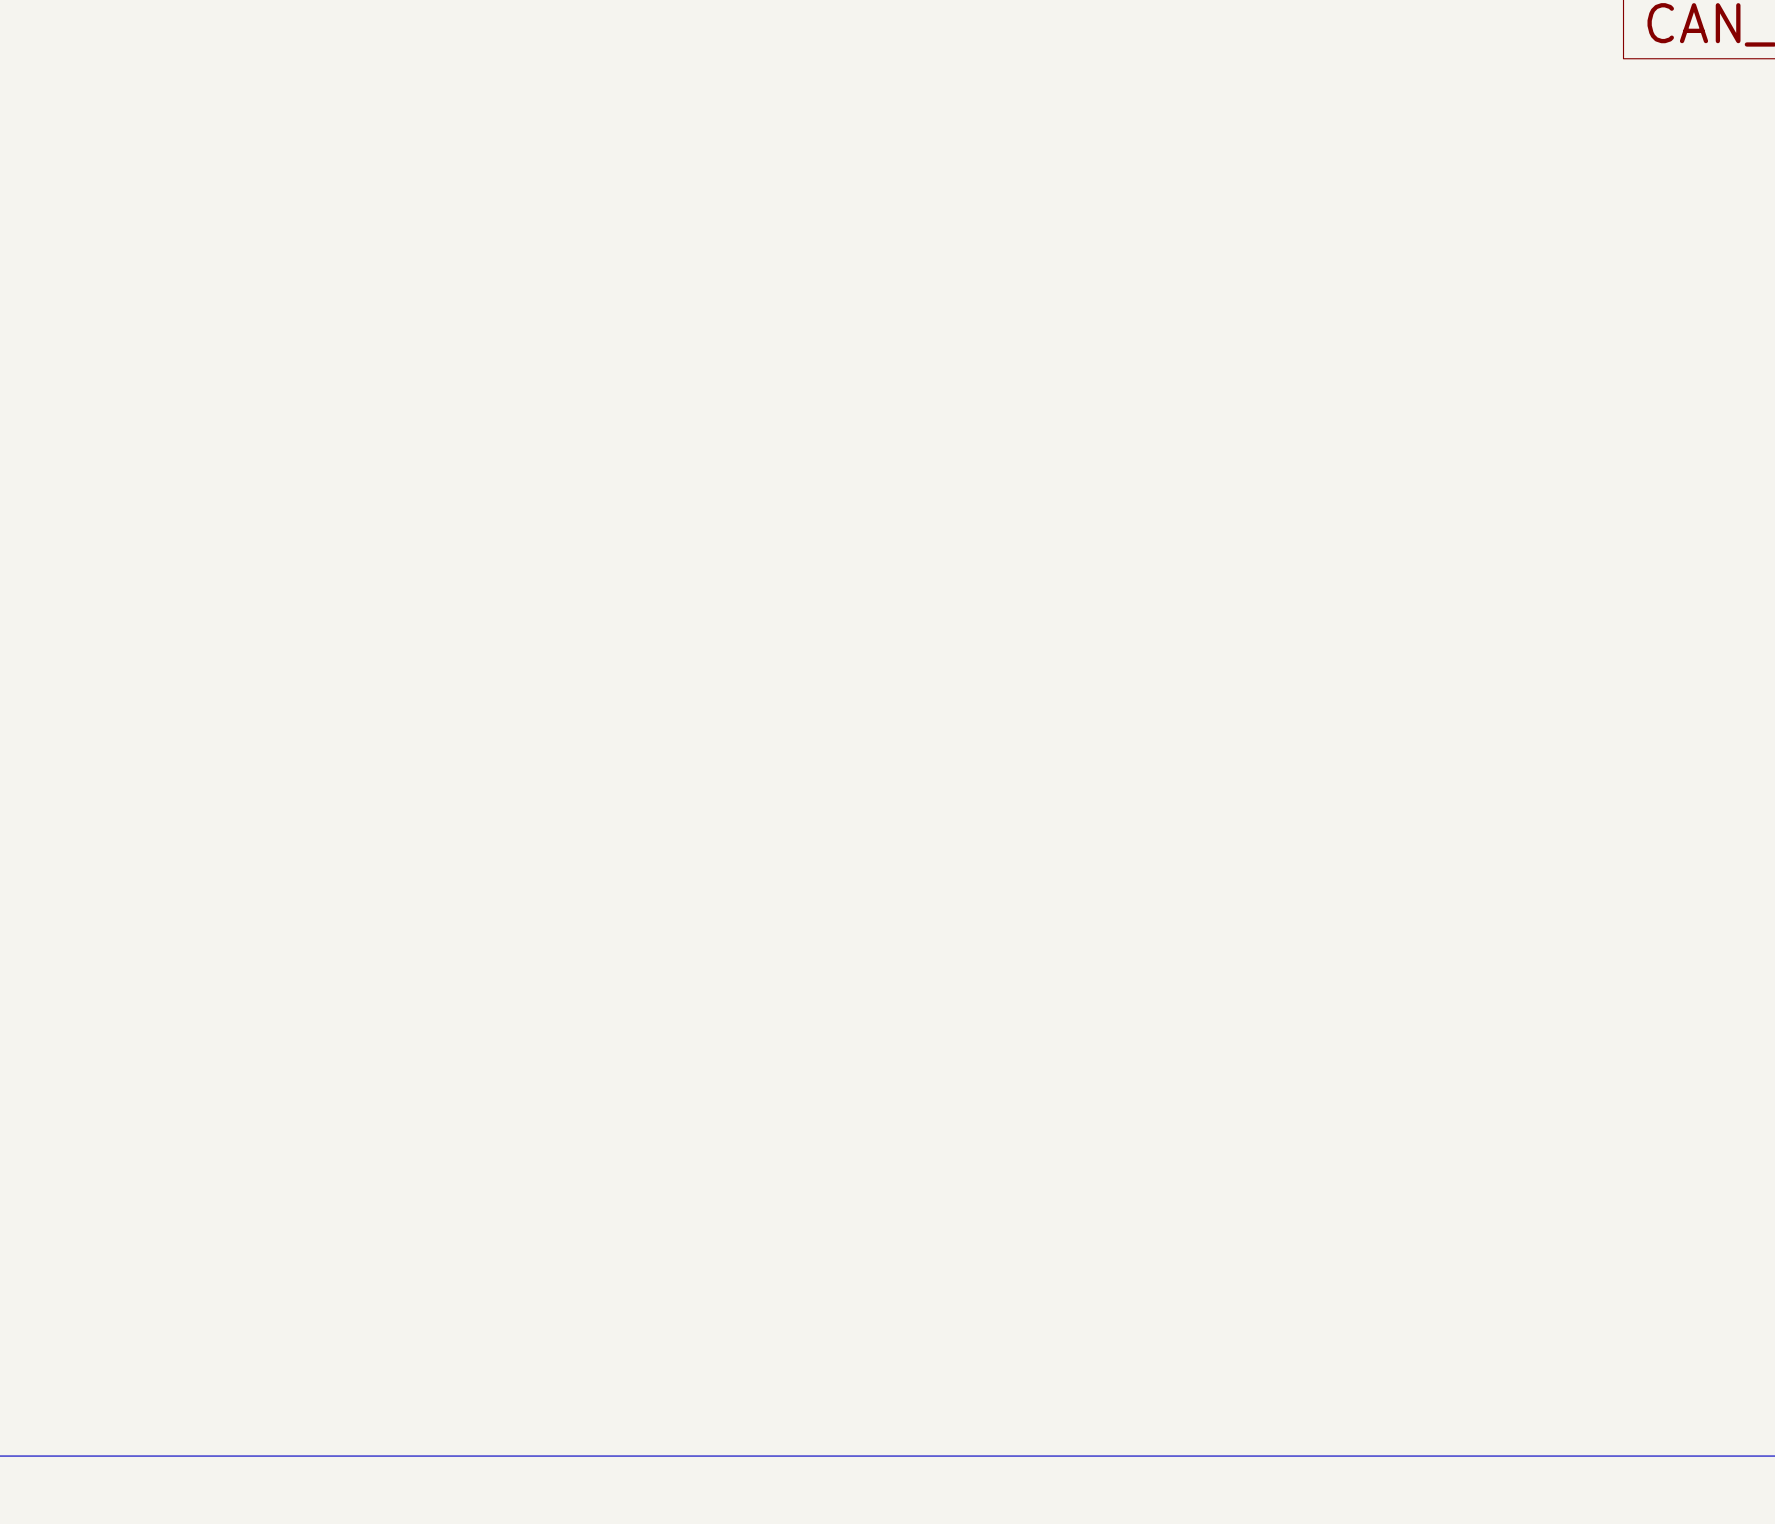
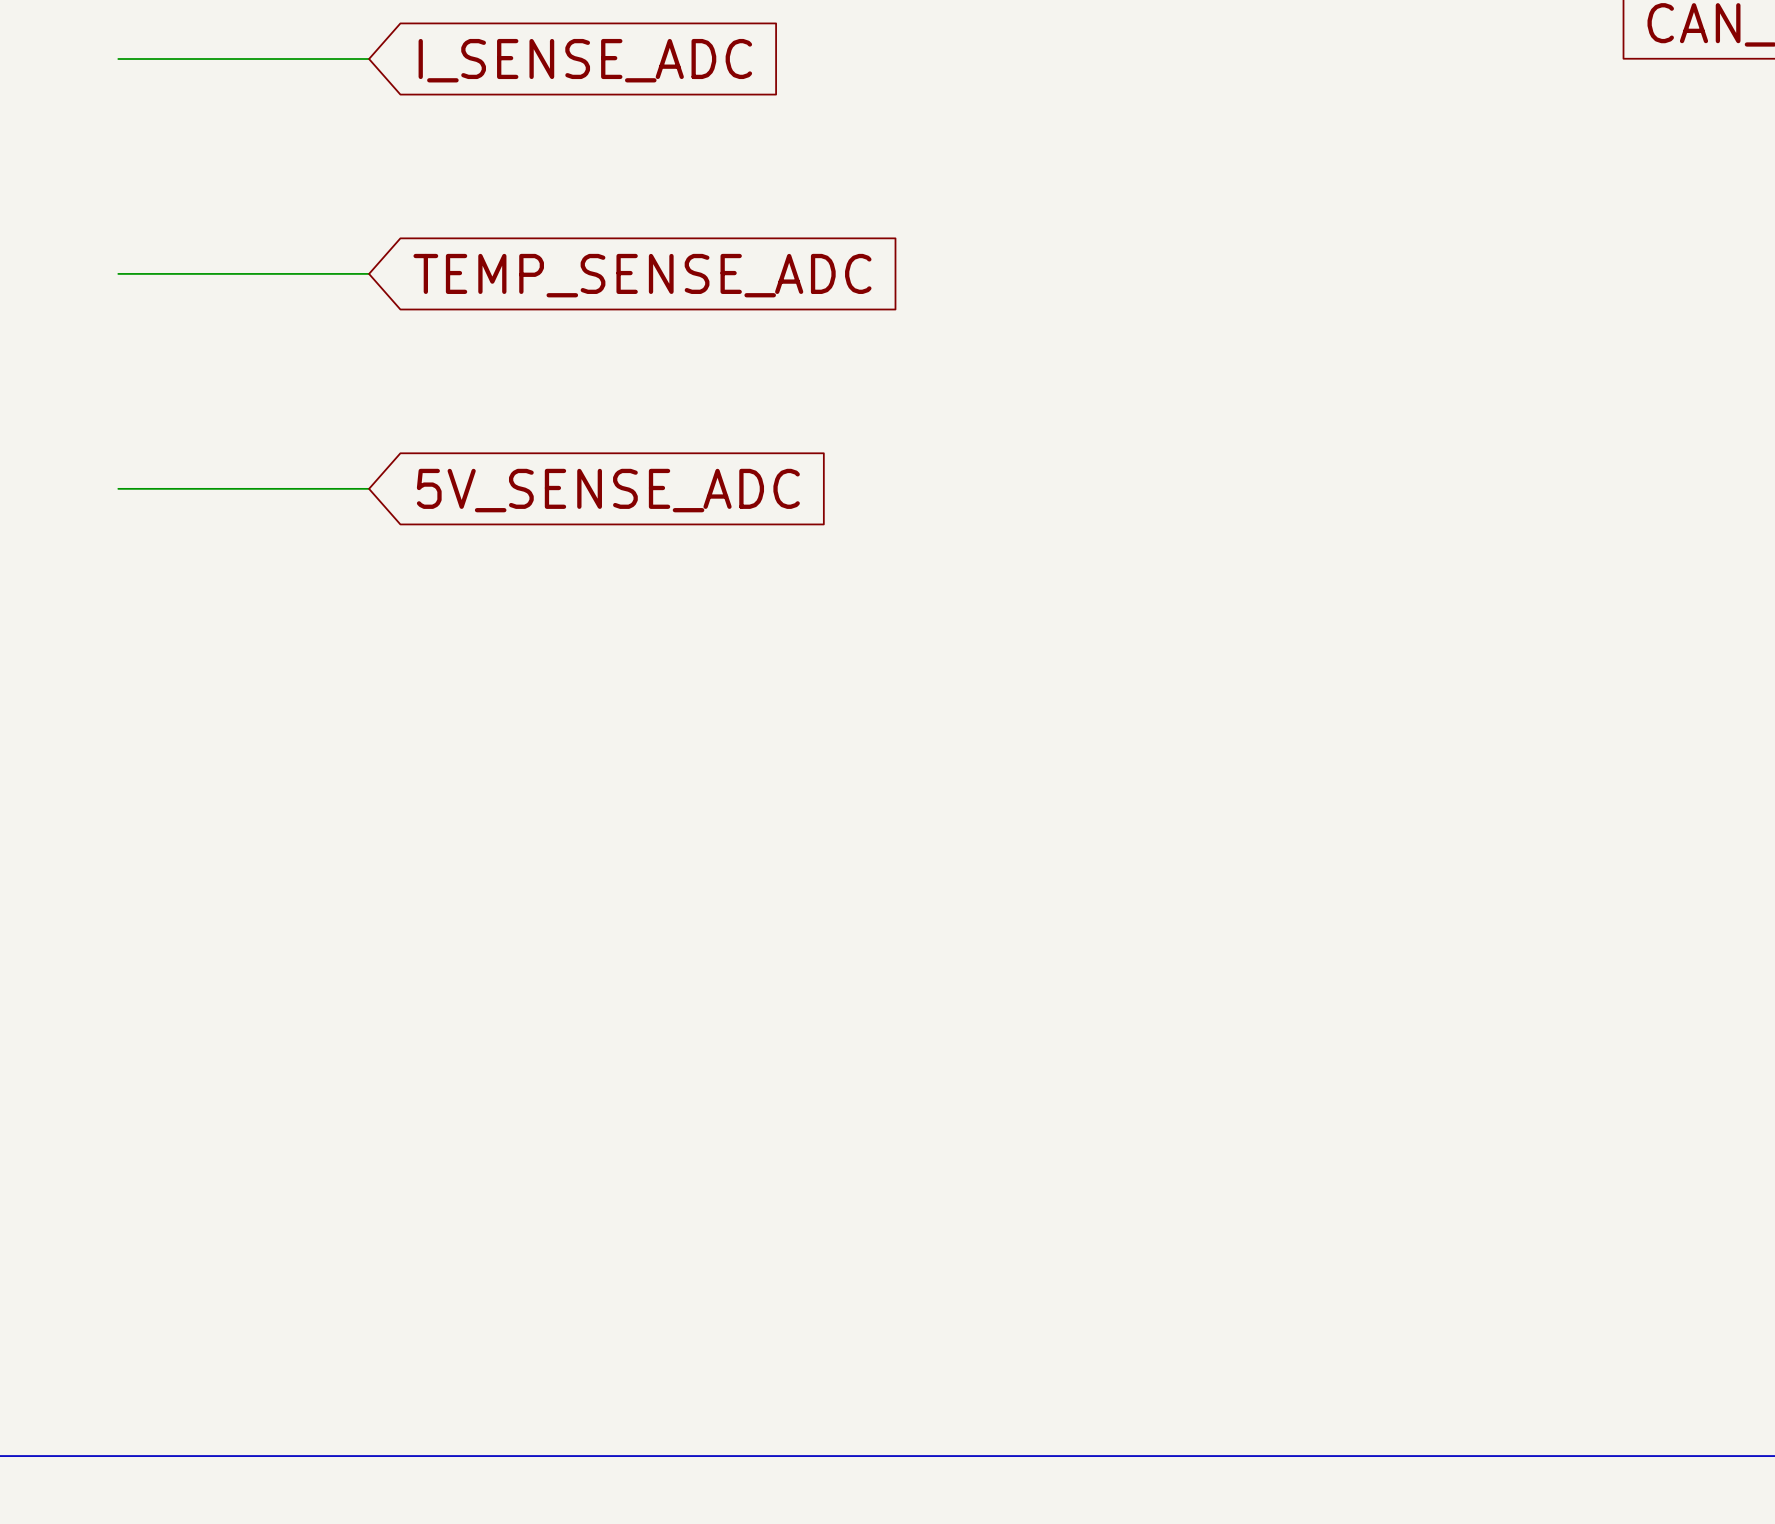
wire: none -> (118, 58) (369, 58)
global label: none -> I_SENSE_ADC (585, 60)
wire: none -> (118, 273) (369, 273)
global label: none -> TEMP_SENSE_ADC (642, 275)
wire: none -> (118, 488) (369, 488)
global label: none -> 5V_SENSE_ADC (608, 490)

